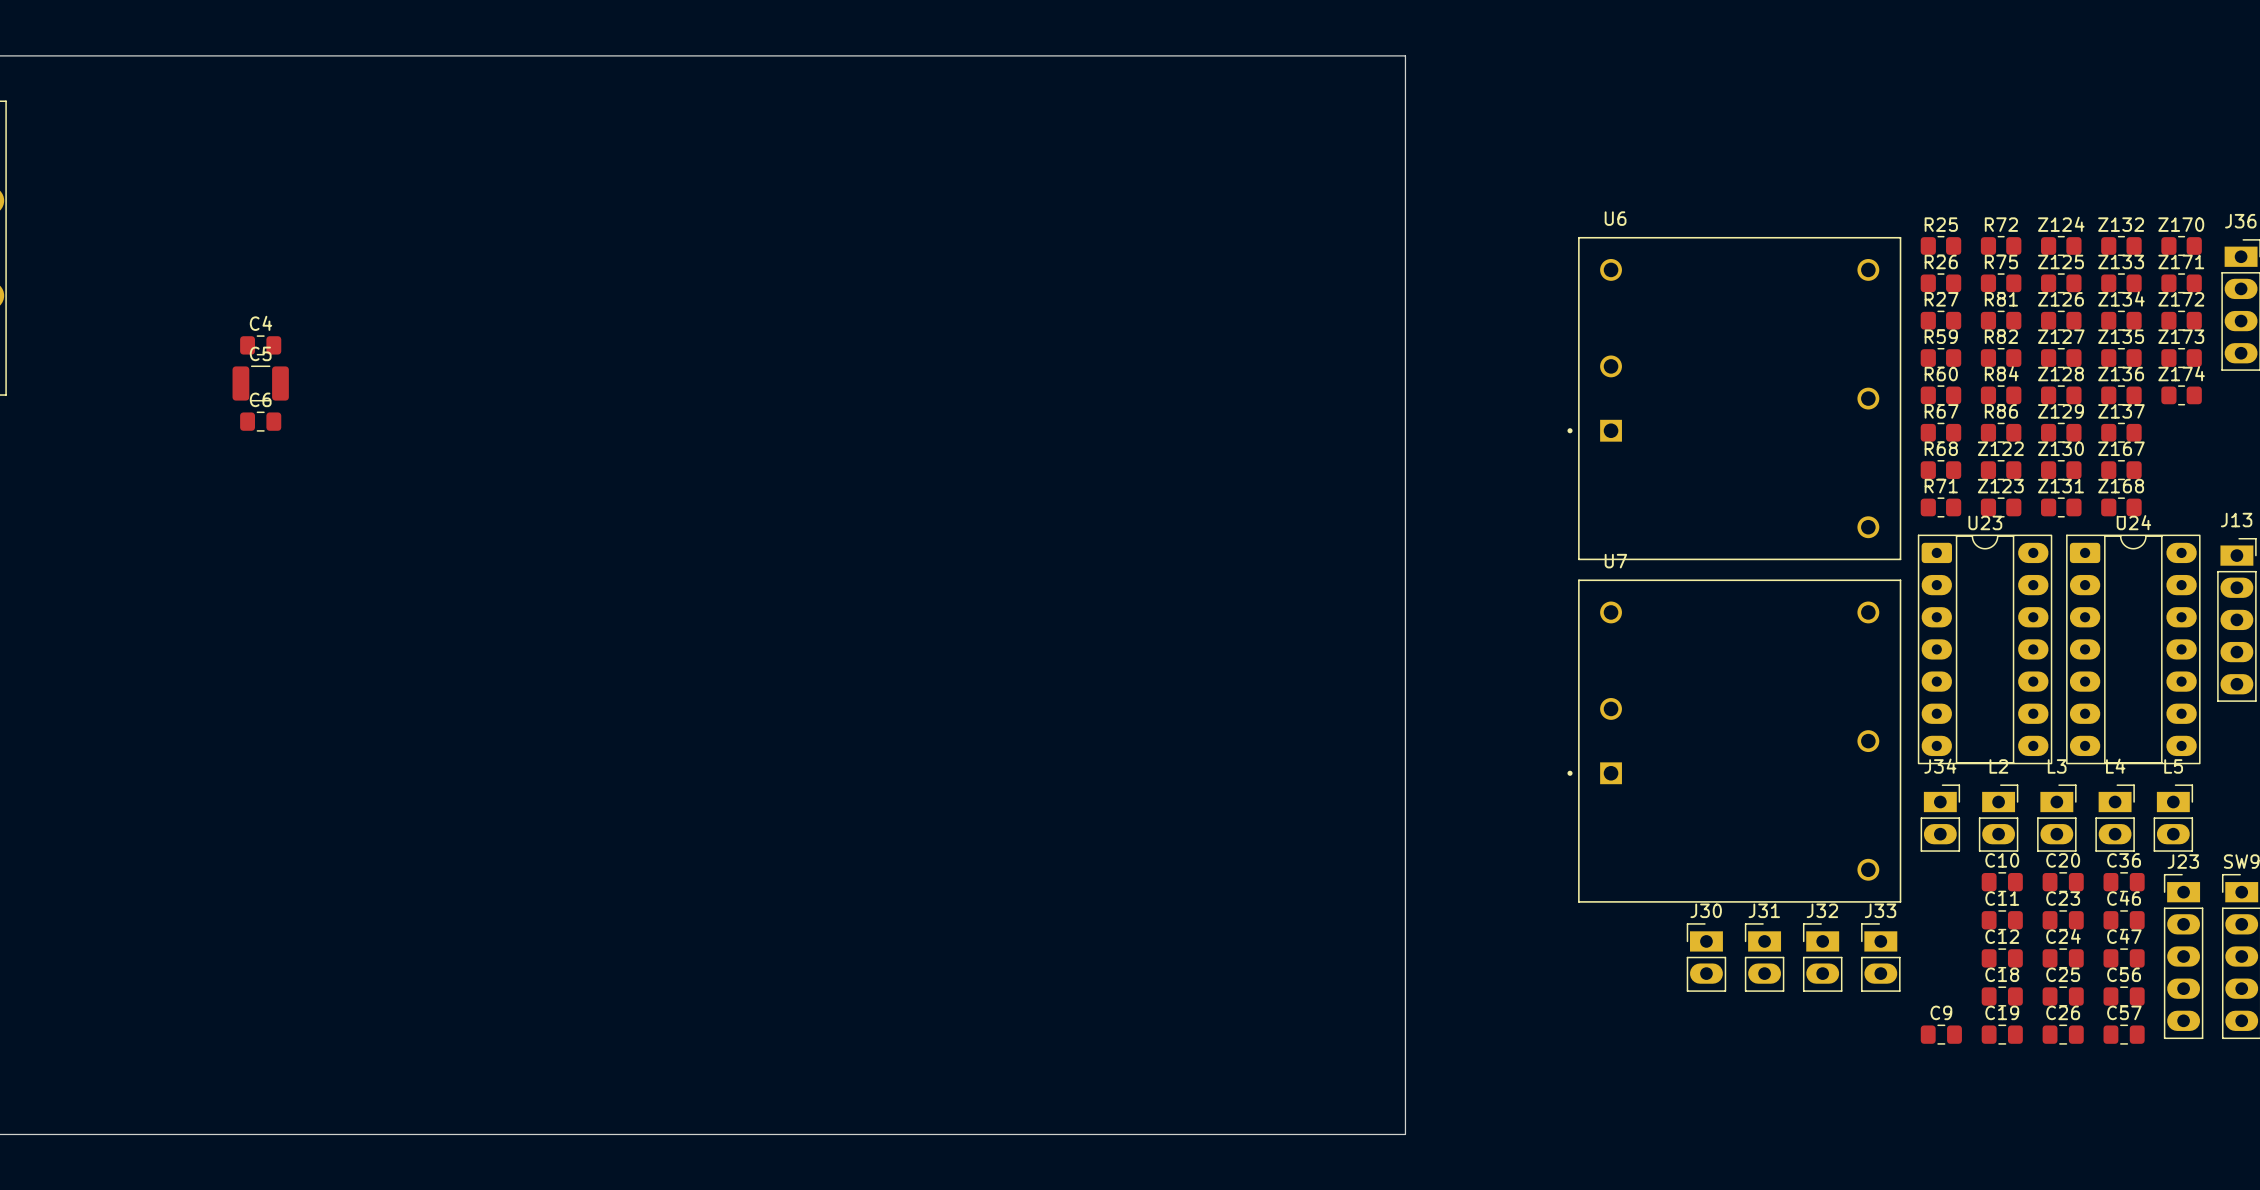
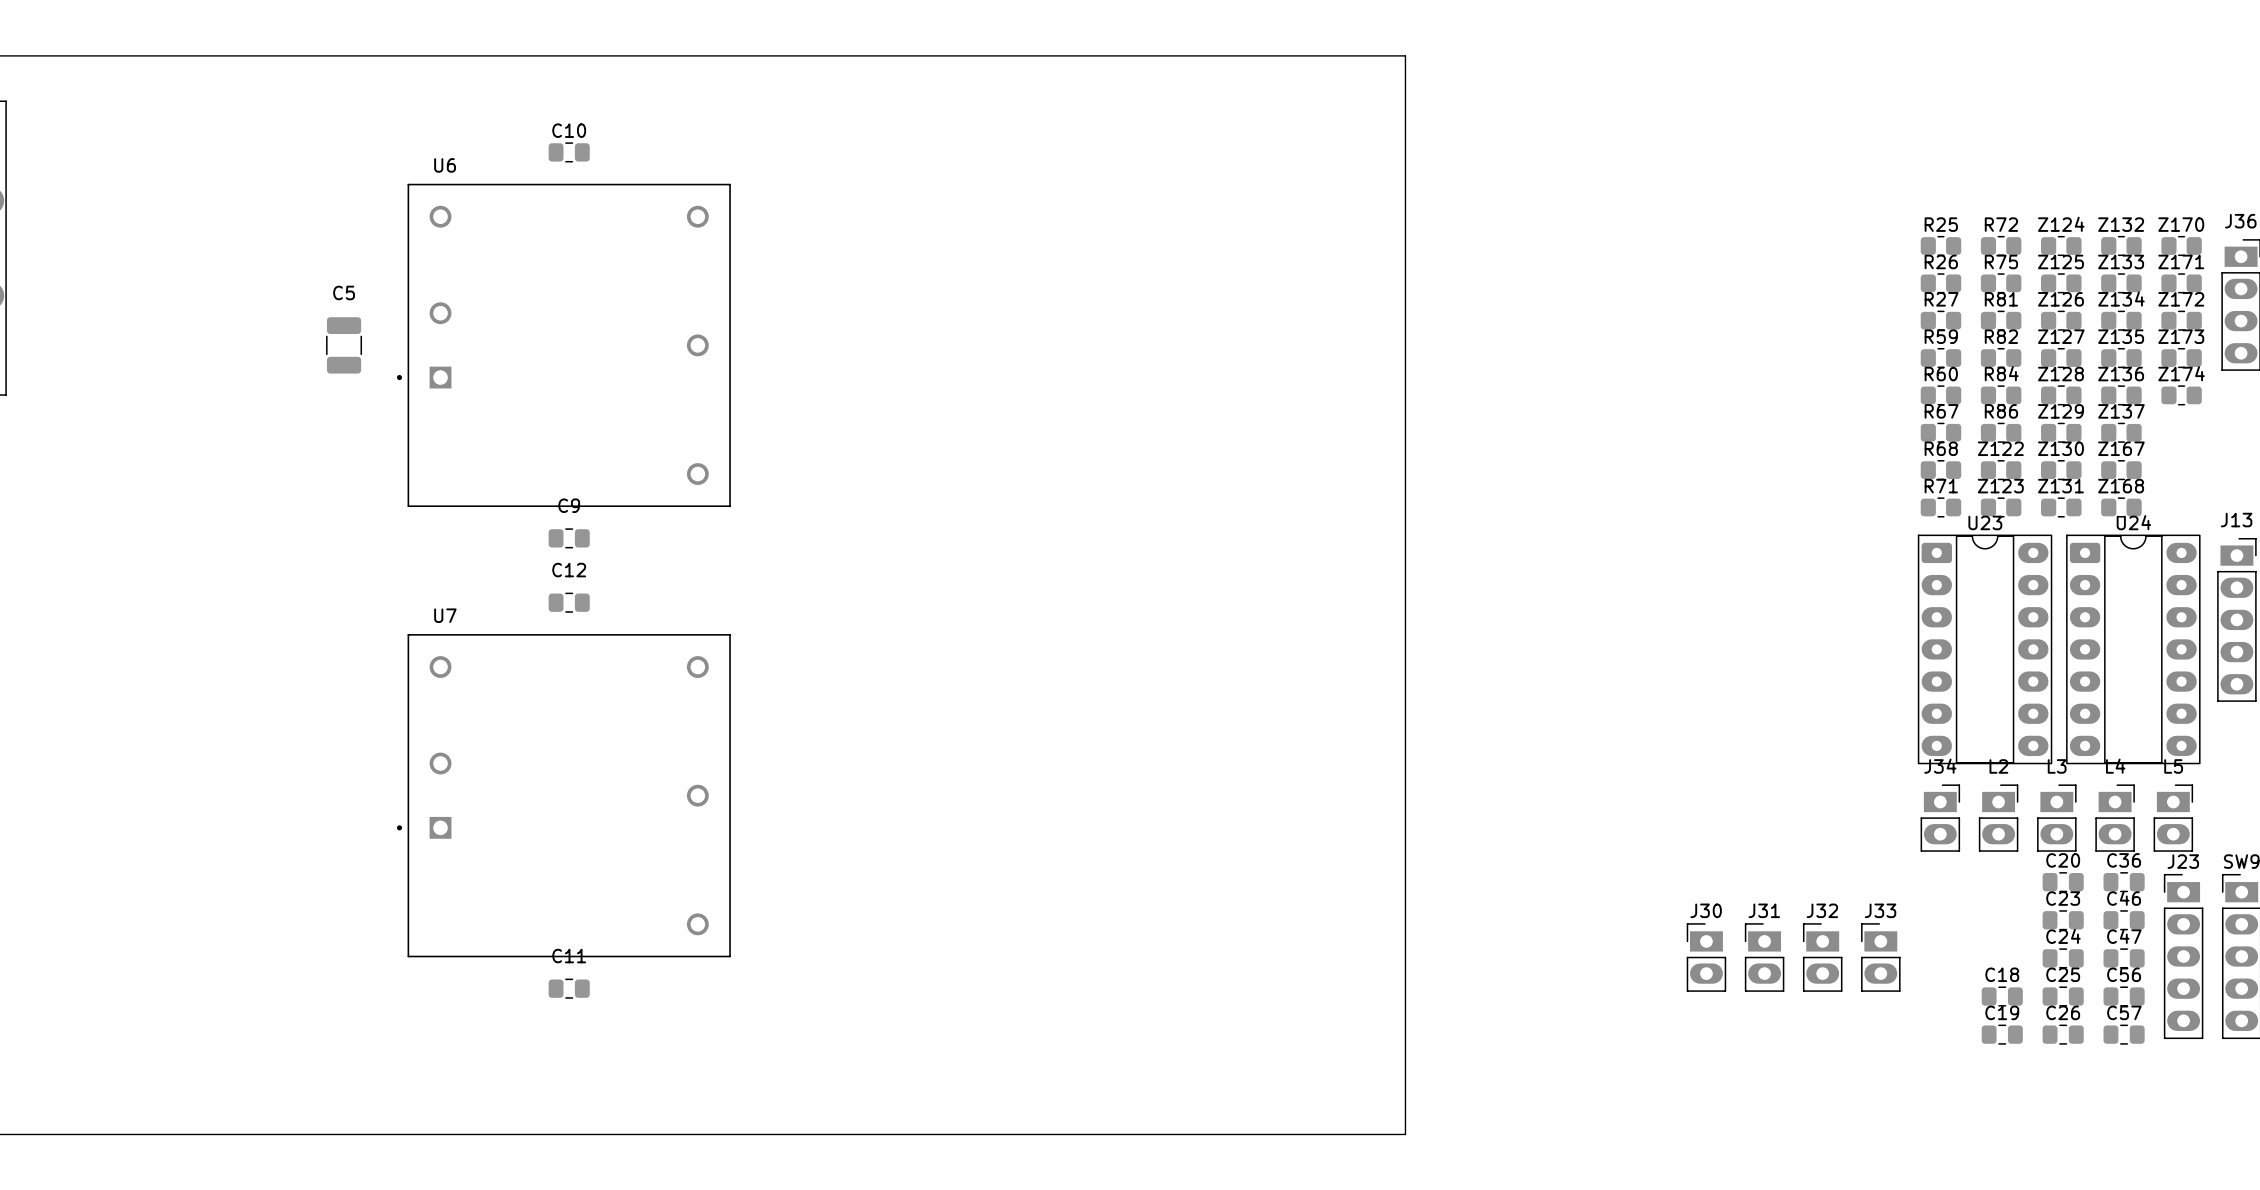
C4: (260, 345) -> none
C5 rotation: 0° (260, 383) -> 90° clockwise (344, 345)
C5 position: (260, 383) -> (344, 345)
U6 position: (1734, 398) -> (563, 345)
C6: (260, 421) -> none
U7 position: (1734, 741) -> (563, 795)
C10 position: (2002, 882) -> (569, 152)
C11 name position: C11 (2002, 898) -> C11 (569, 956)
C11 position: (2002, 920) -> (569, 988)
C12 name position: C12 (2002, 936) -> C12 (569, 570)
C12 position: (2002, 958) -> (569, 602)
C9 name position: C9 (1941, 1012) -> C9 (569, 505)
C9 position: (1941, 1034) -> (569, 538)

